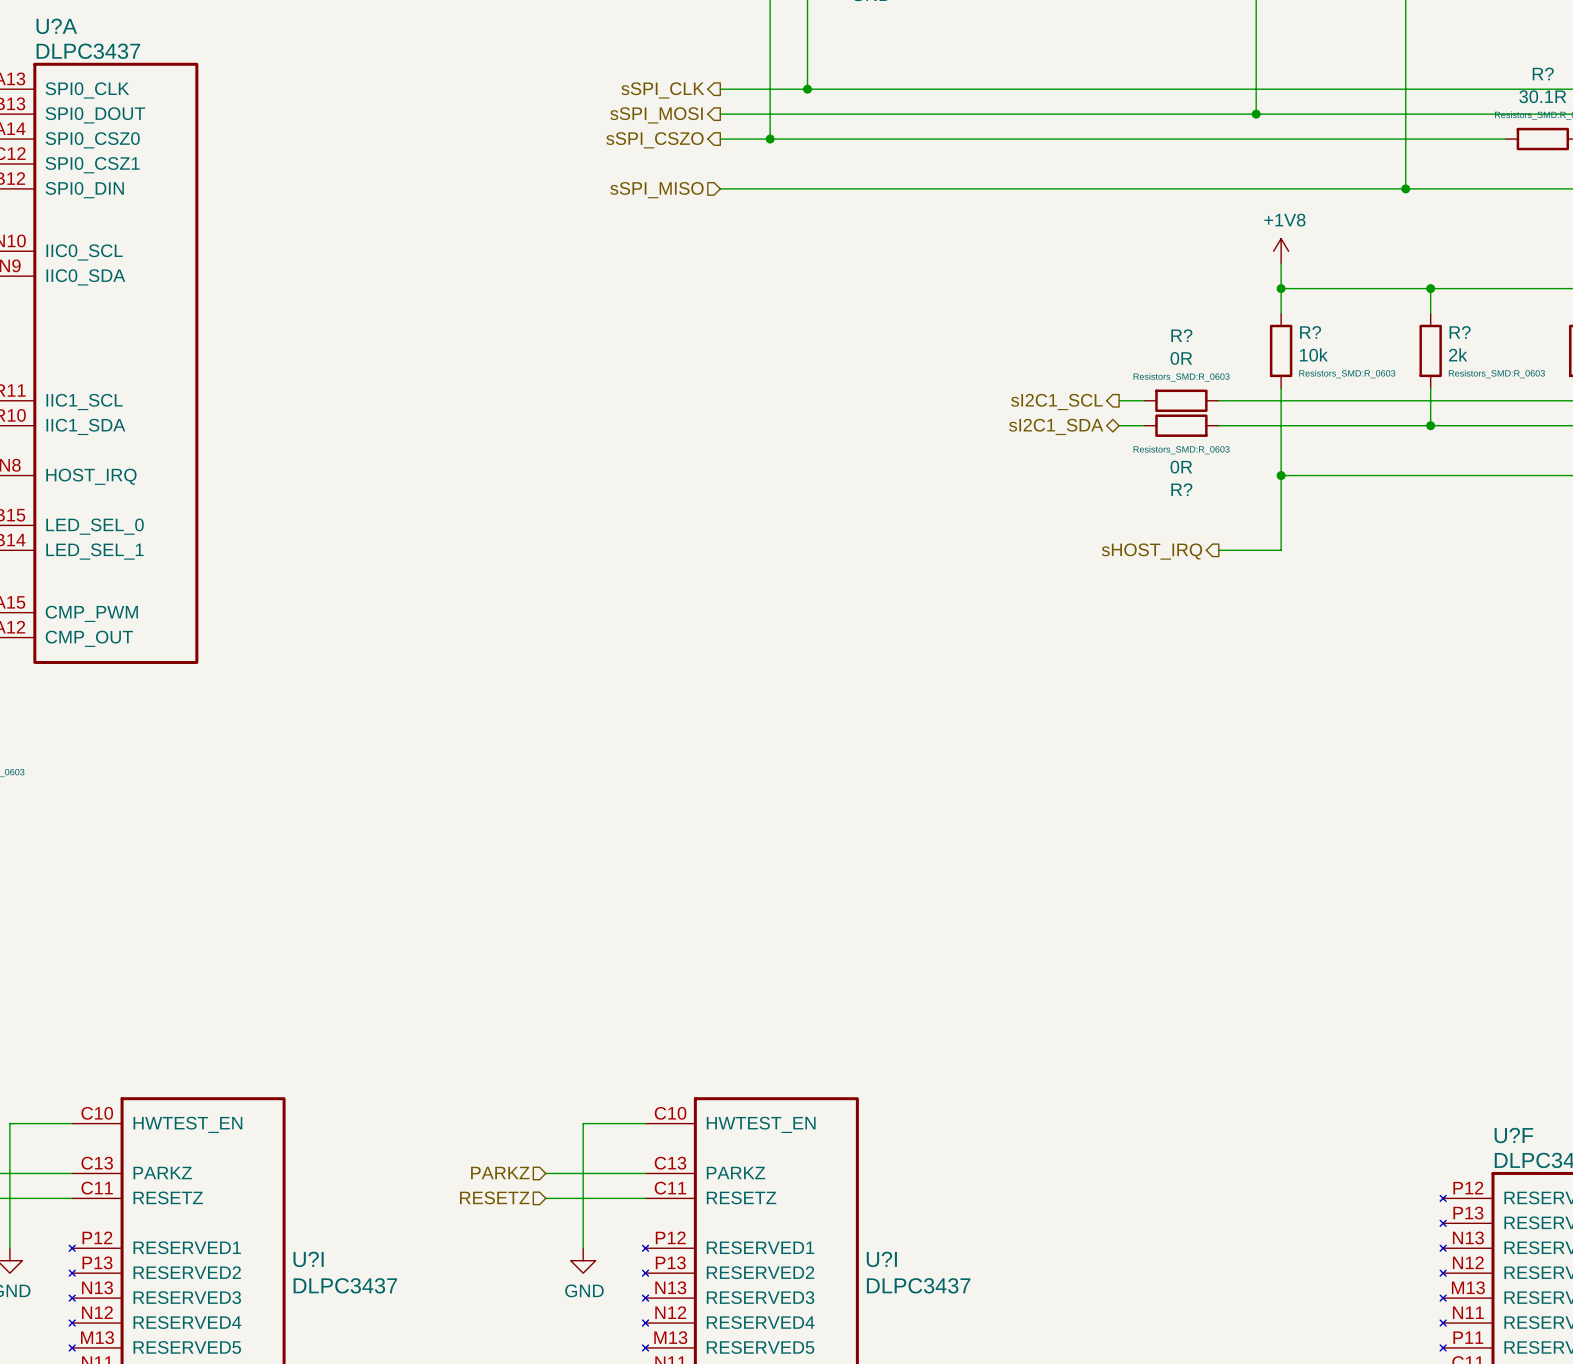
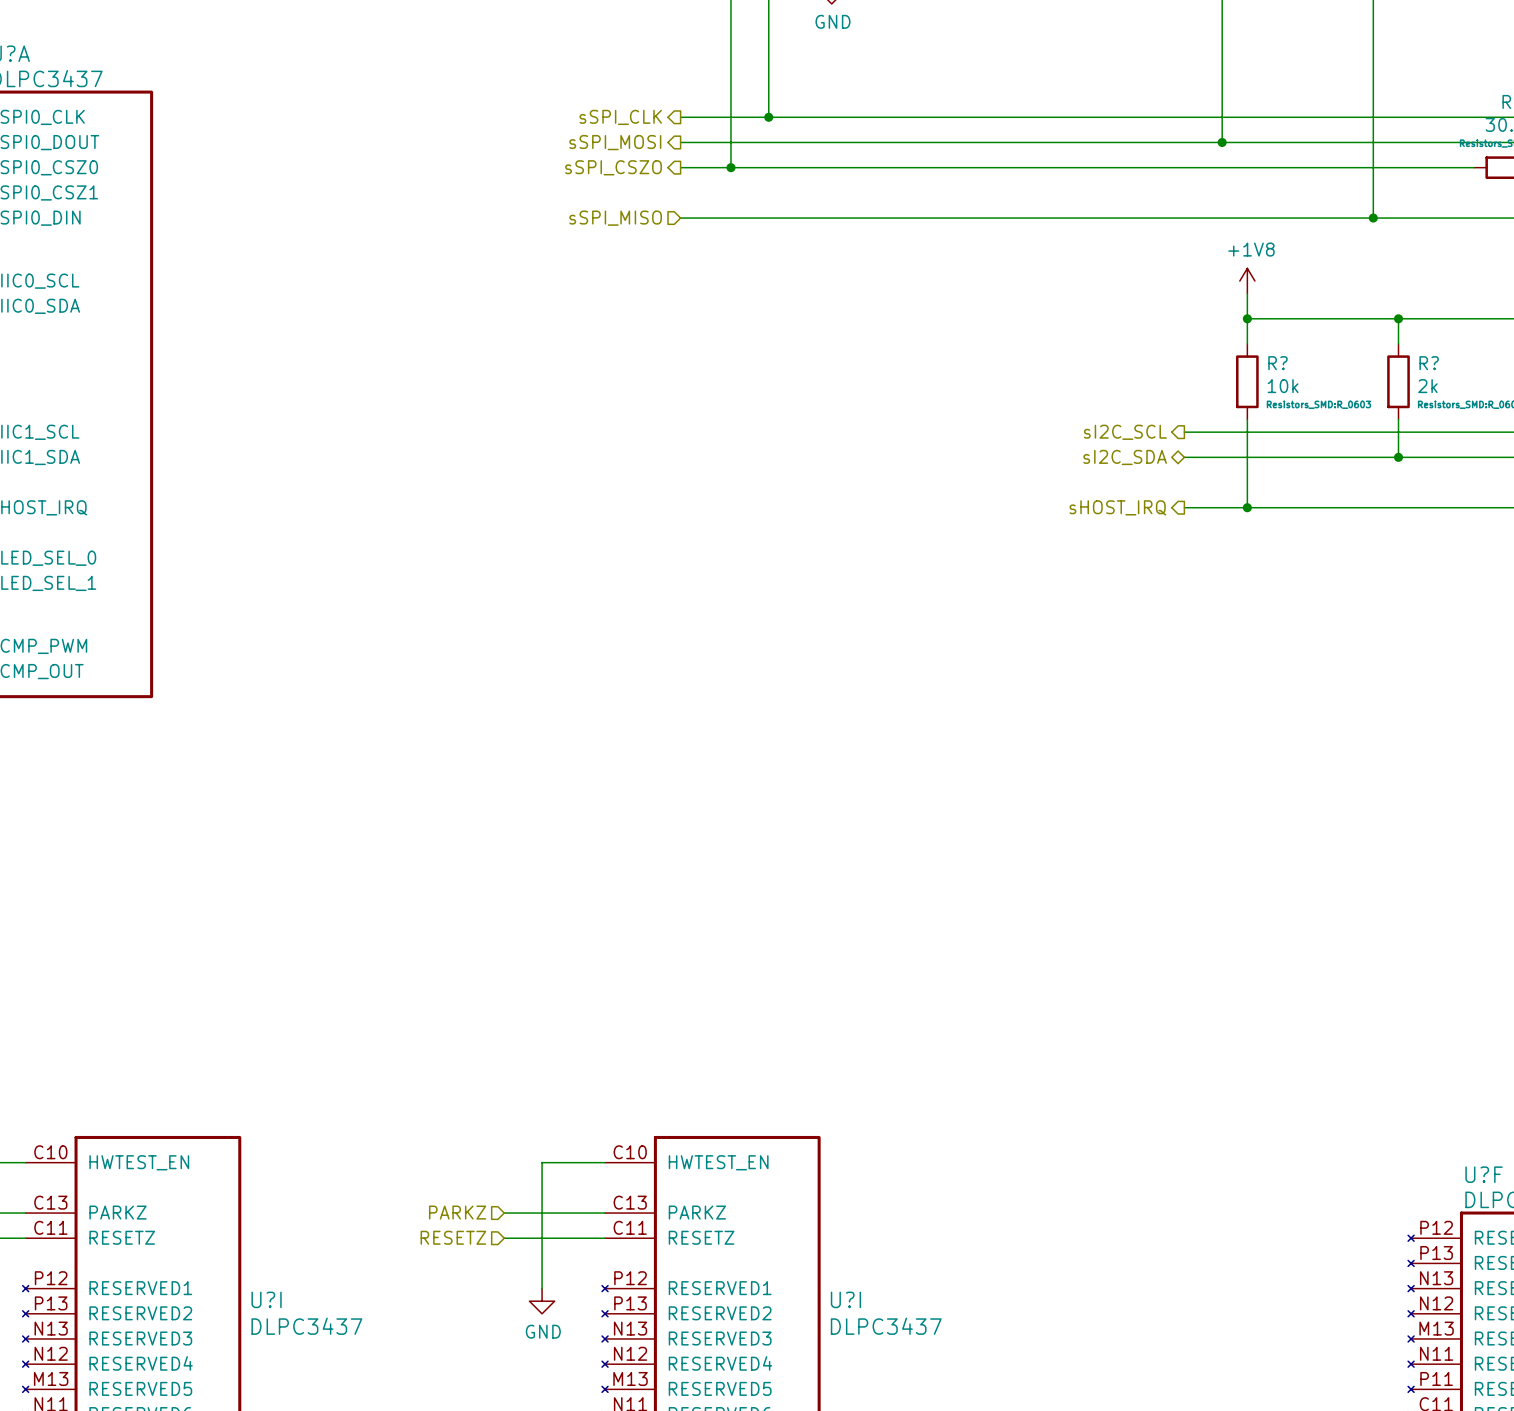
wire: (1119, 400) (1144, 400) -> none
R?: 0R (1181, 400) -> none
hierarchical label: sI2C1_SCL (1056, 402) -> none
hierarchical label: none -> sI2C_SCL (1125, 432)
wire: (1119, 425) (1144, 425) -> none
R?: 0R (1181, 425) -> none
hierarchical label: sI2C1_SDA (1056, 426) -> none
hierarchical label: none -> sI2C_SDA (1125, 457)
wire: (1281, 475) (1281, 550) (1218, 550) -> (1247, 507) (1184, 507)
hierarchical label position: sHOST_IRQ (1151, 551) -> sHOST_IRQ (1117, 507)

